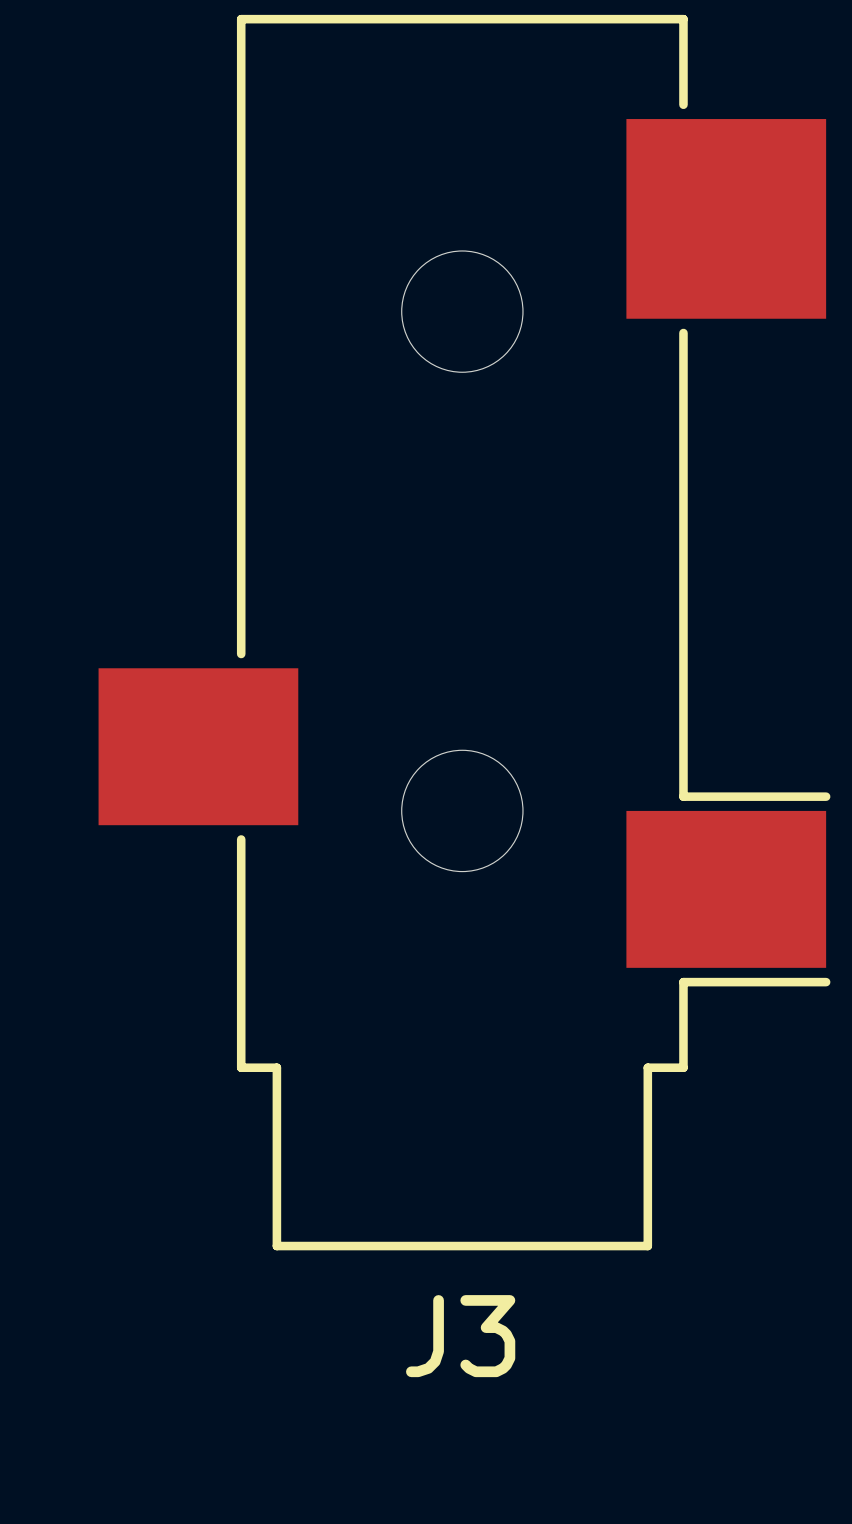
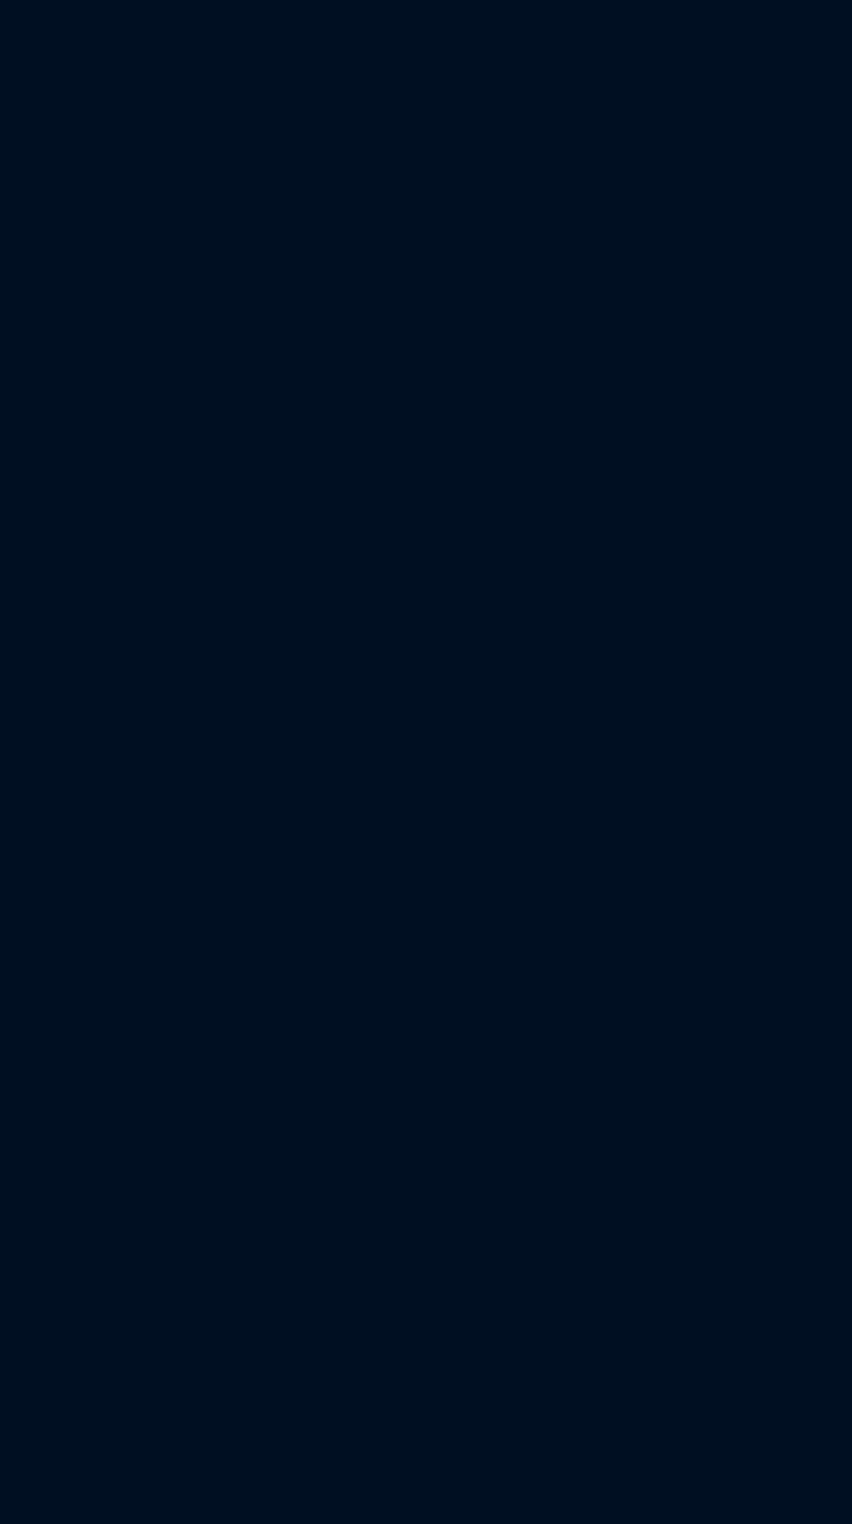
J3: (464, 632) -> none

